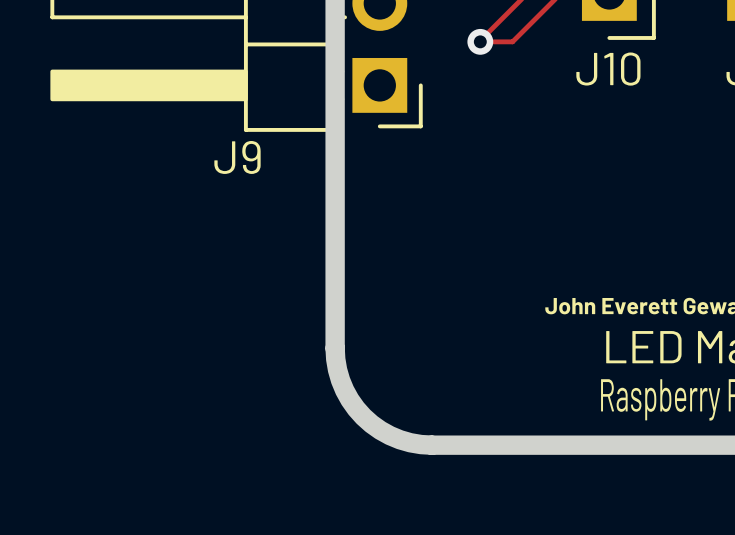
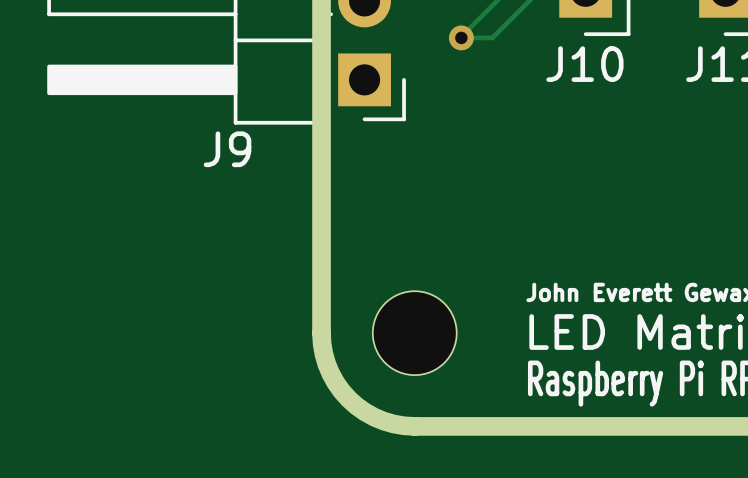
part: none -> (414, 333)

